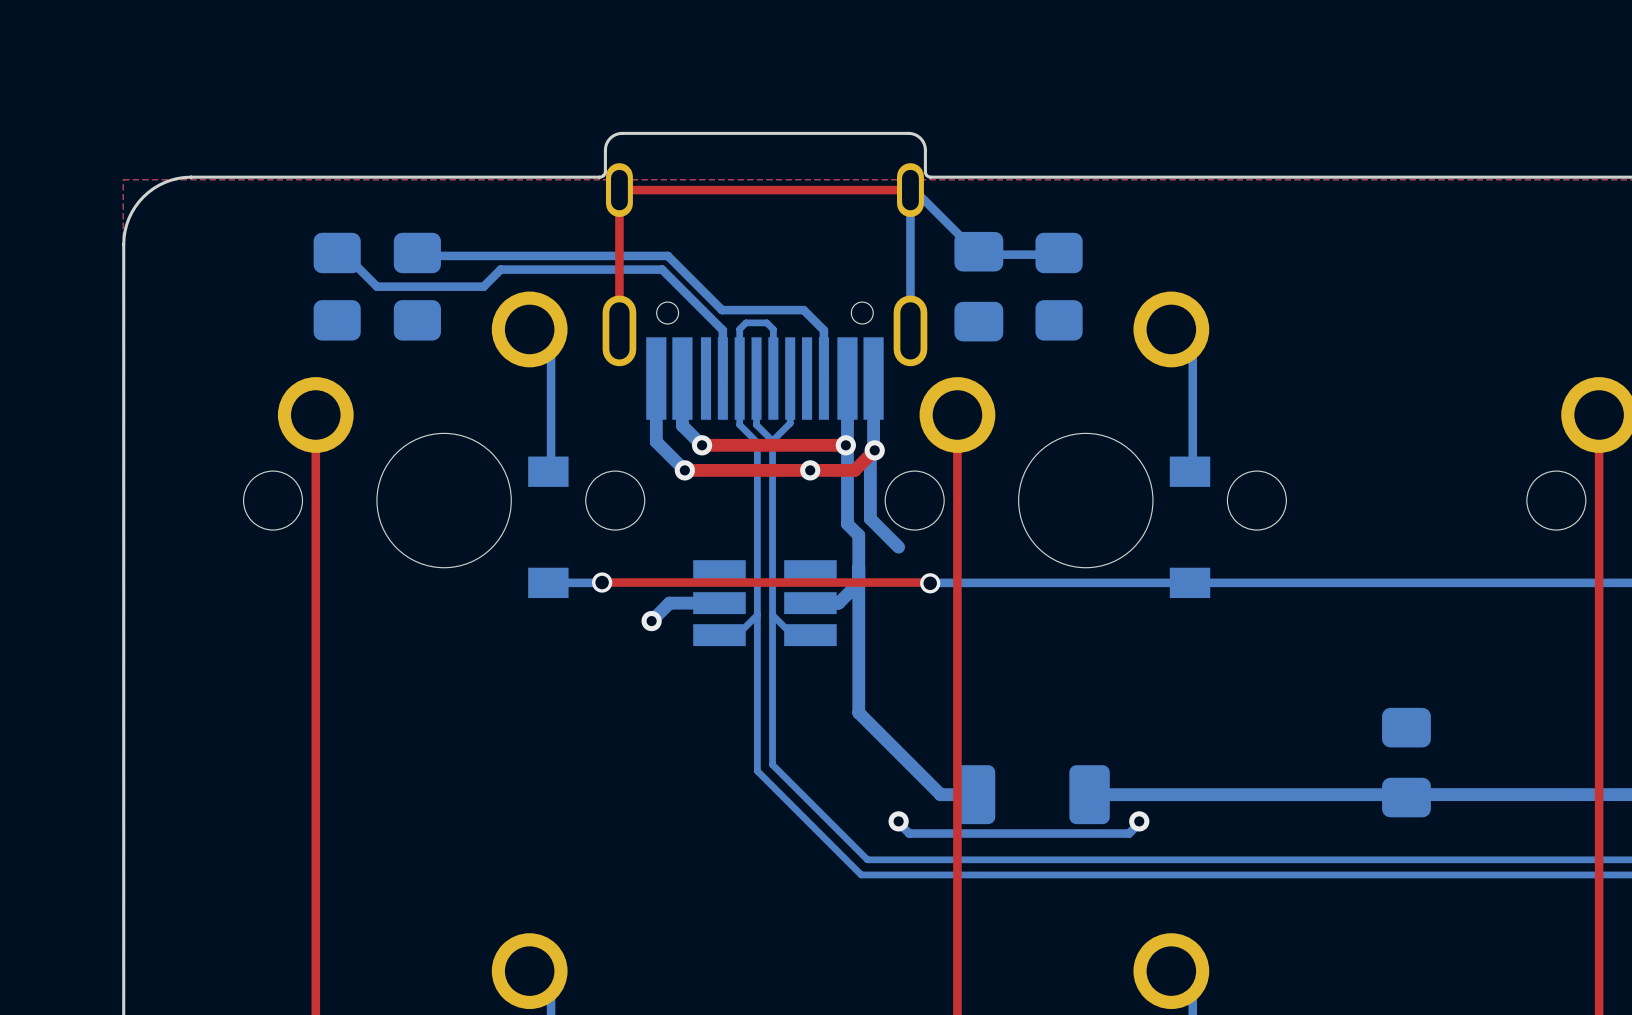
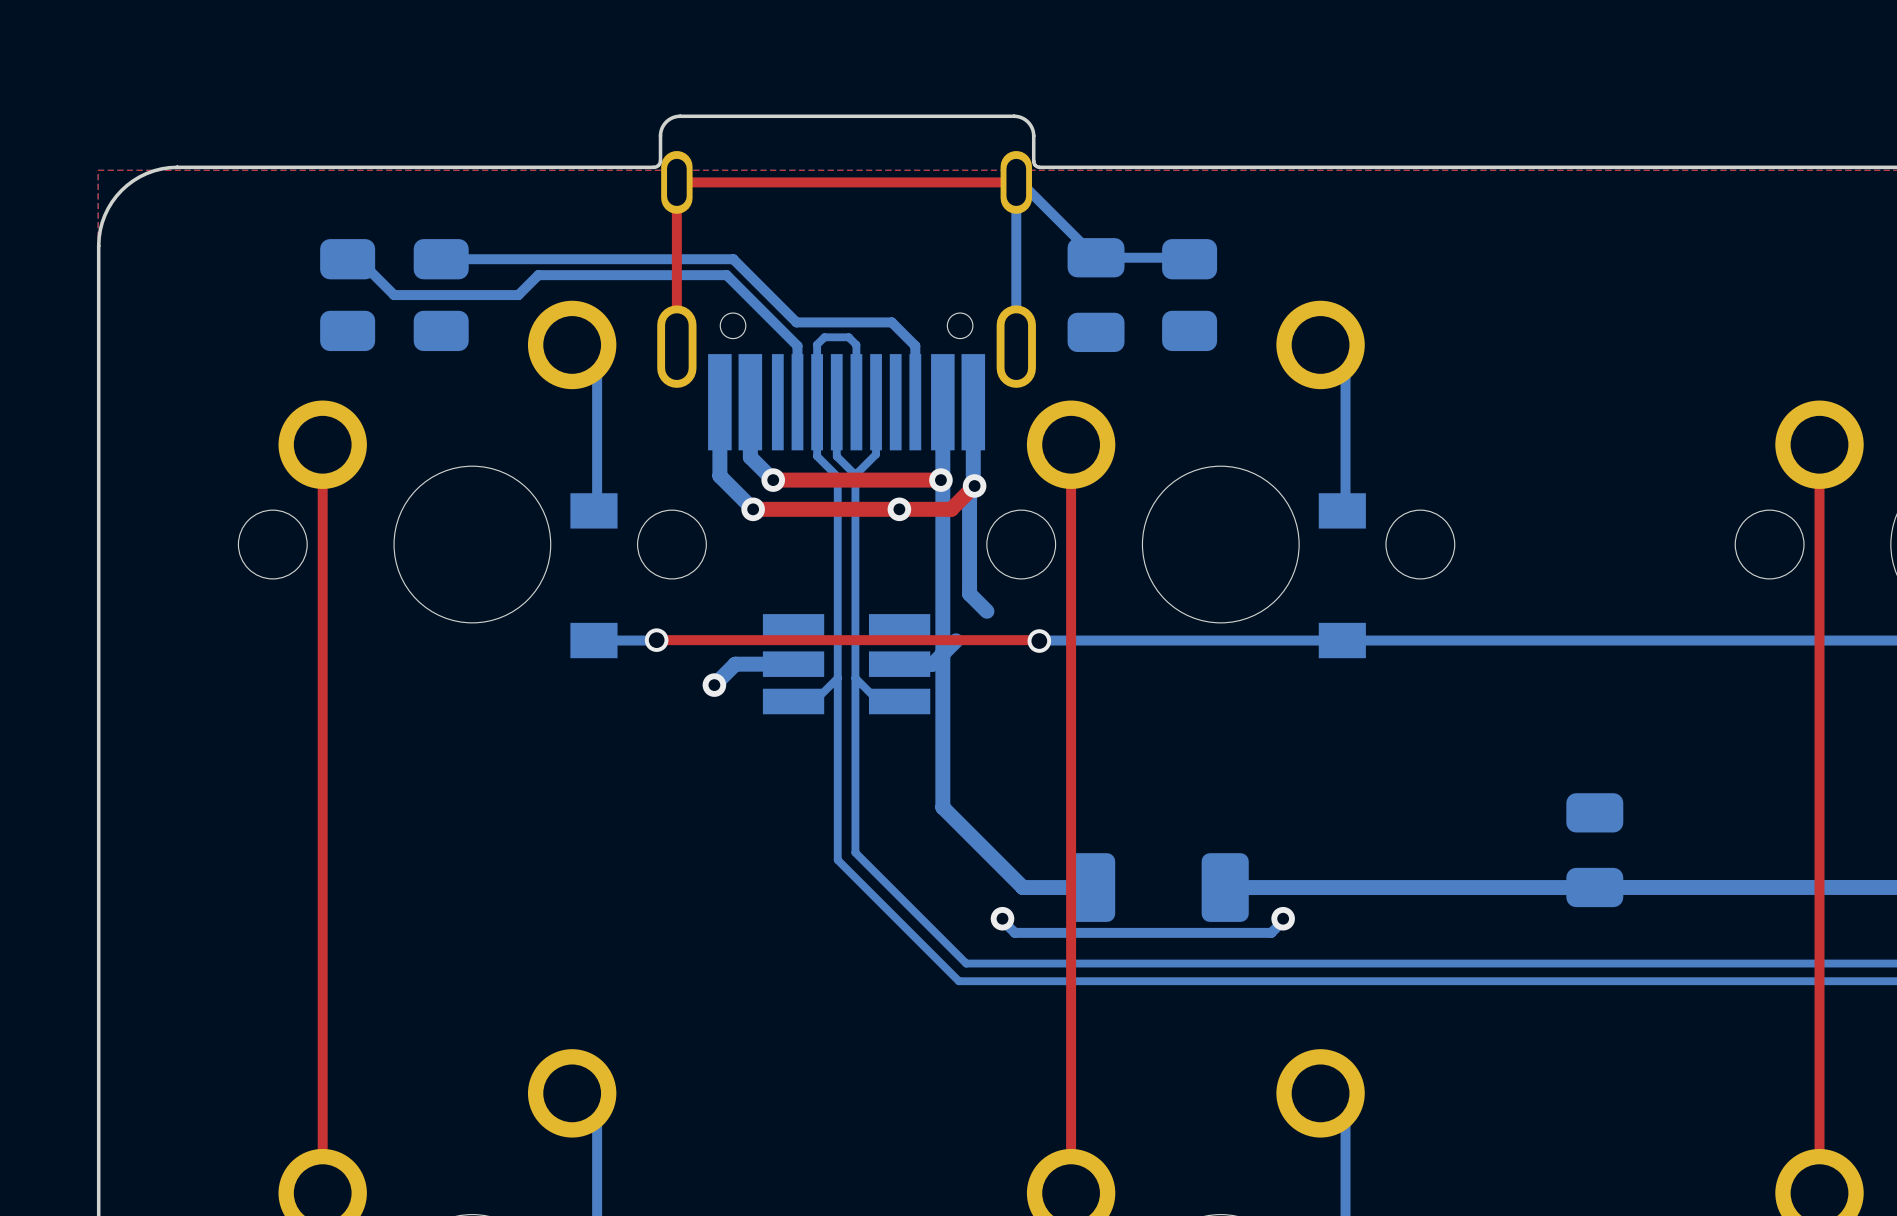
part footprint: [954, 231, 1004, 342] -> [1067, 238, 1125, 353]
part footprint: [313, 232, 361, 341] -> [320, 239, 376, 352]
part footprint: [393, 232, 441, 341] -> [413, 239, 469, 352]
part footprint: [1035, 232, 1083, 341] -> [1162, 239, 1218, 352]
bottom track: (870, 518) (898, 547) -> (969, 565) (969, 593) (986, 611)
bottom track: (847, 524) (858, 535) (858, 712) (940, 794) -> (942, 571) (942, 807) (1022, 887) (1051, 887)
part footprint: [1382, 707, 1431, 818] -> [1566, 793, 1624, 908]

